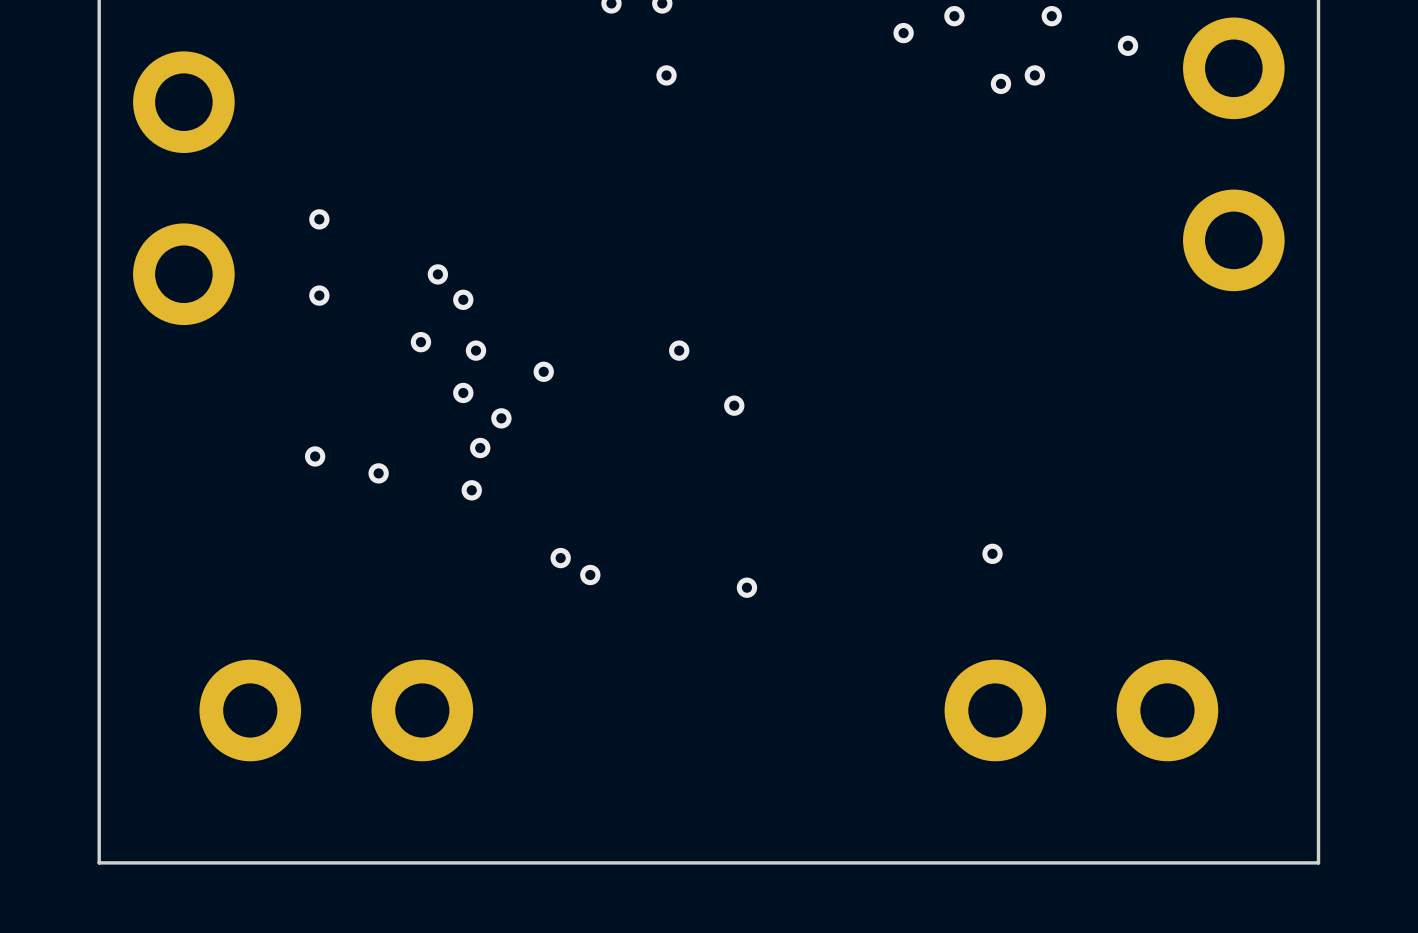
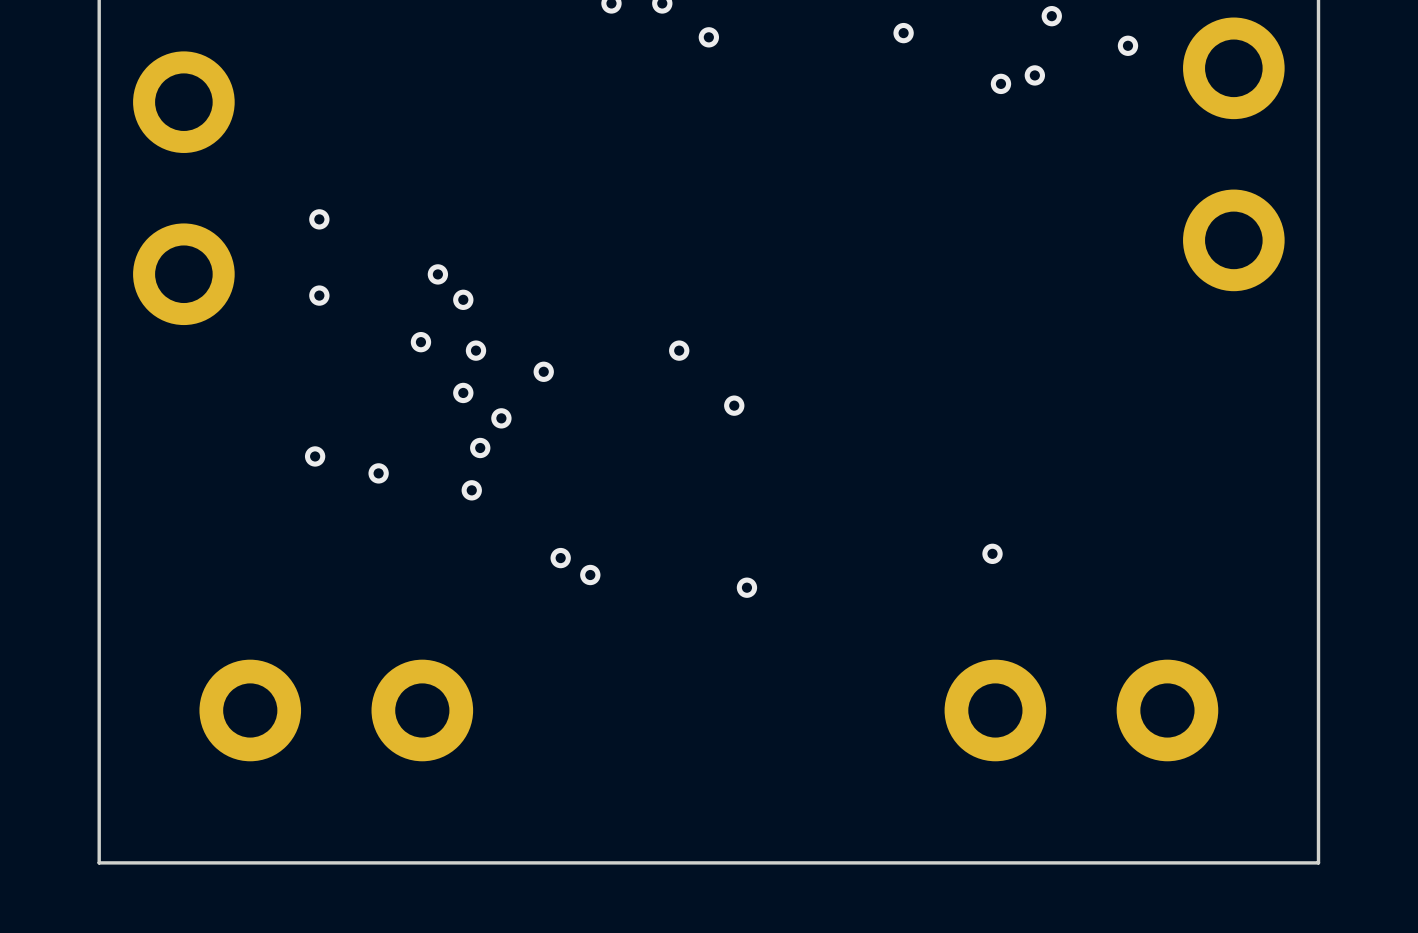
via: (954, 16) -> none
via position: (666, 75) -> (708, 37)

